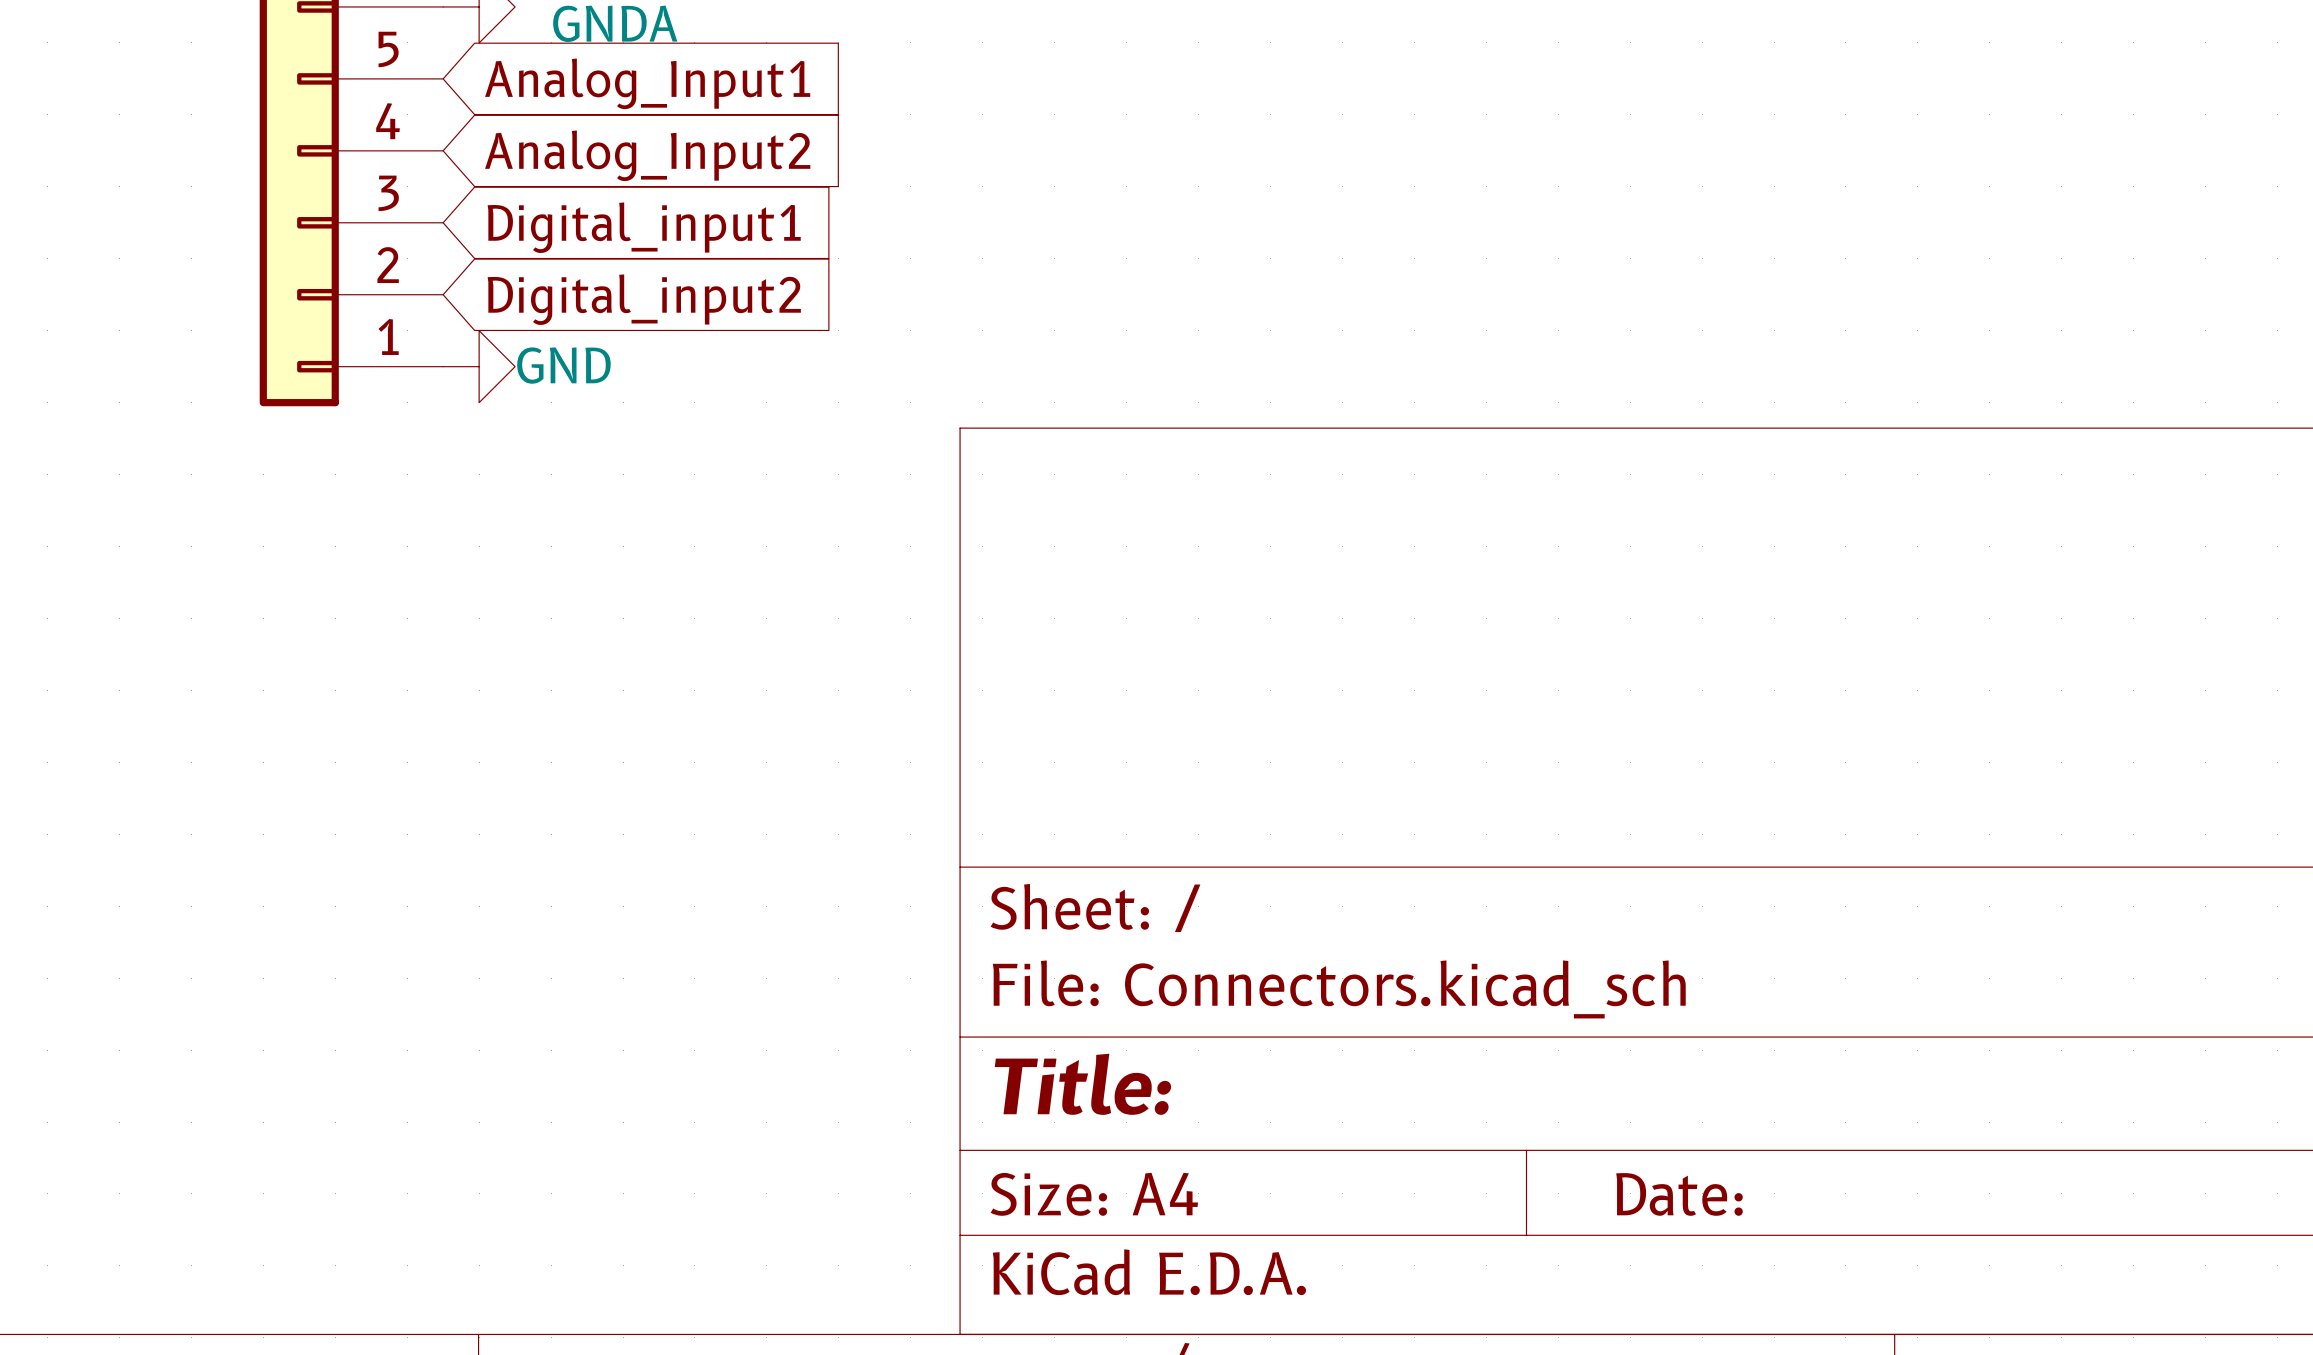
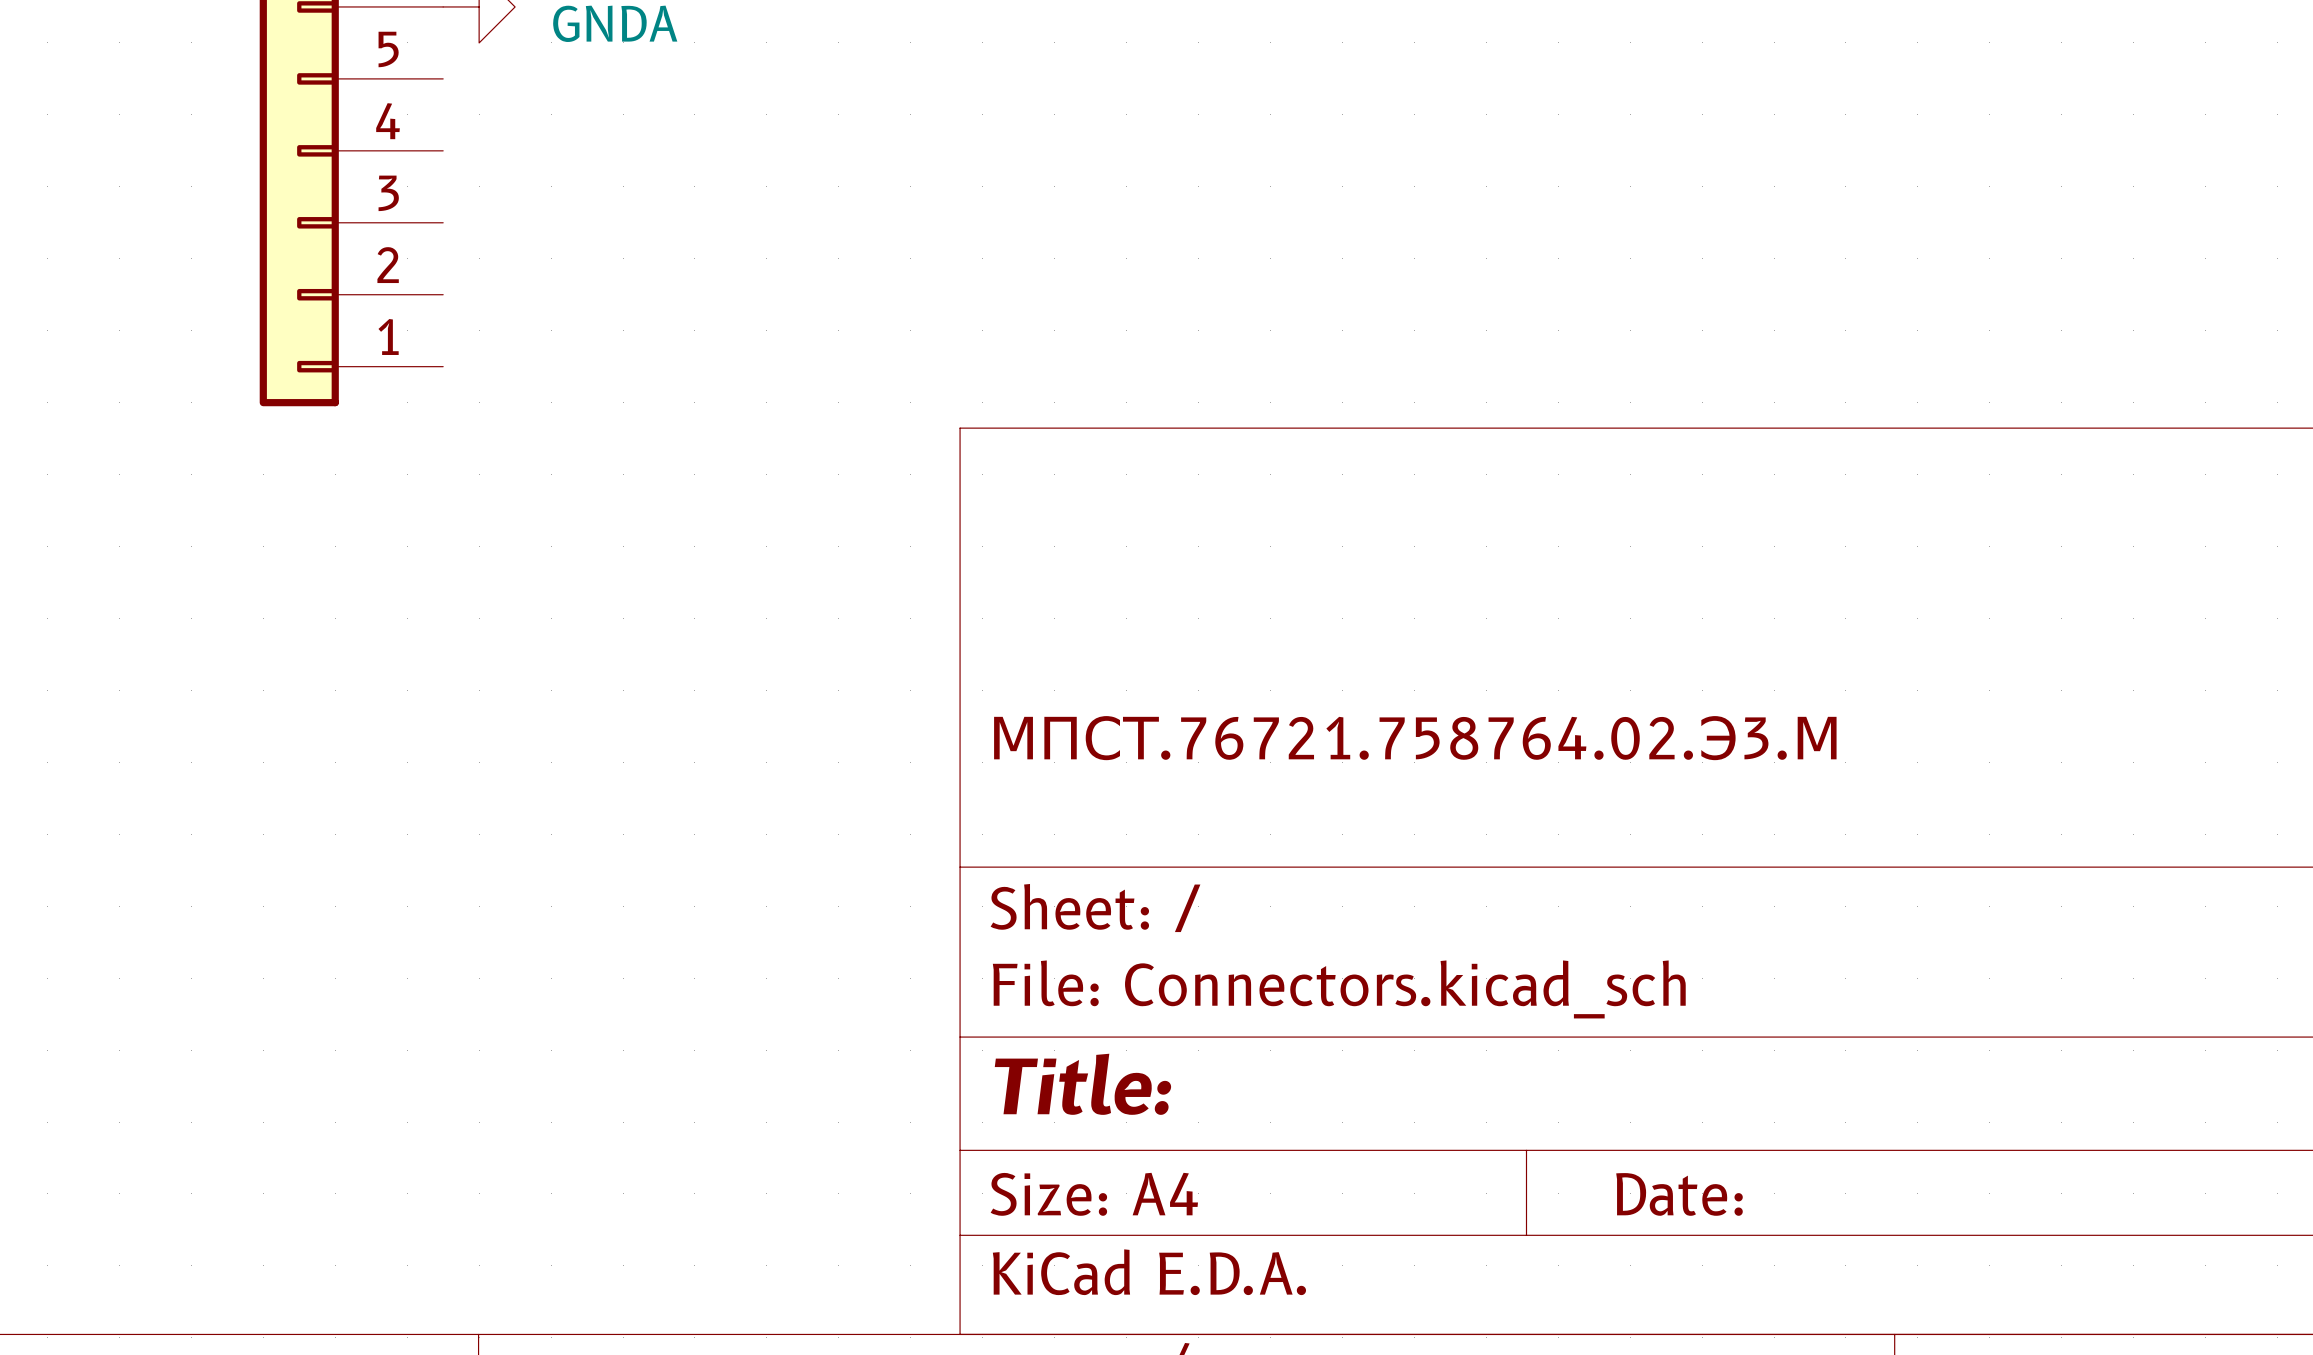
global label: Analog_Input1 (647, 83) -> none
global label: Analog_Input2 (647, 155) -> none
global label: Digital_input1 (644, 227) -> none
global label: Digital_input2 (644, 299) -> none
power symbol: GND (479, 366) -> none
title block: none -> МПСТ.76721.758764.02.Э3.М (1415, 738)

